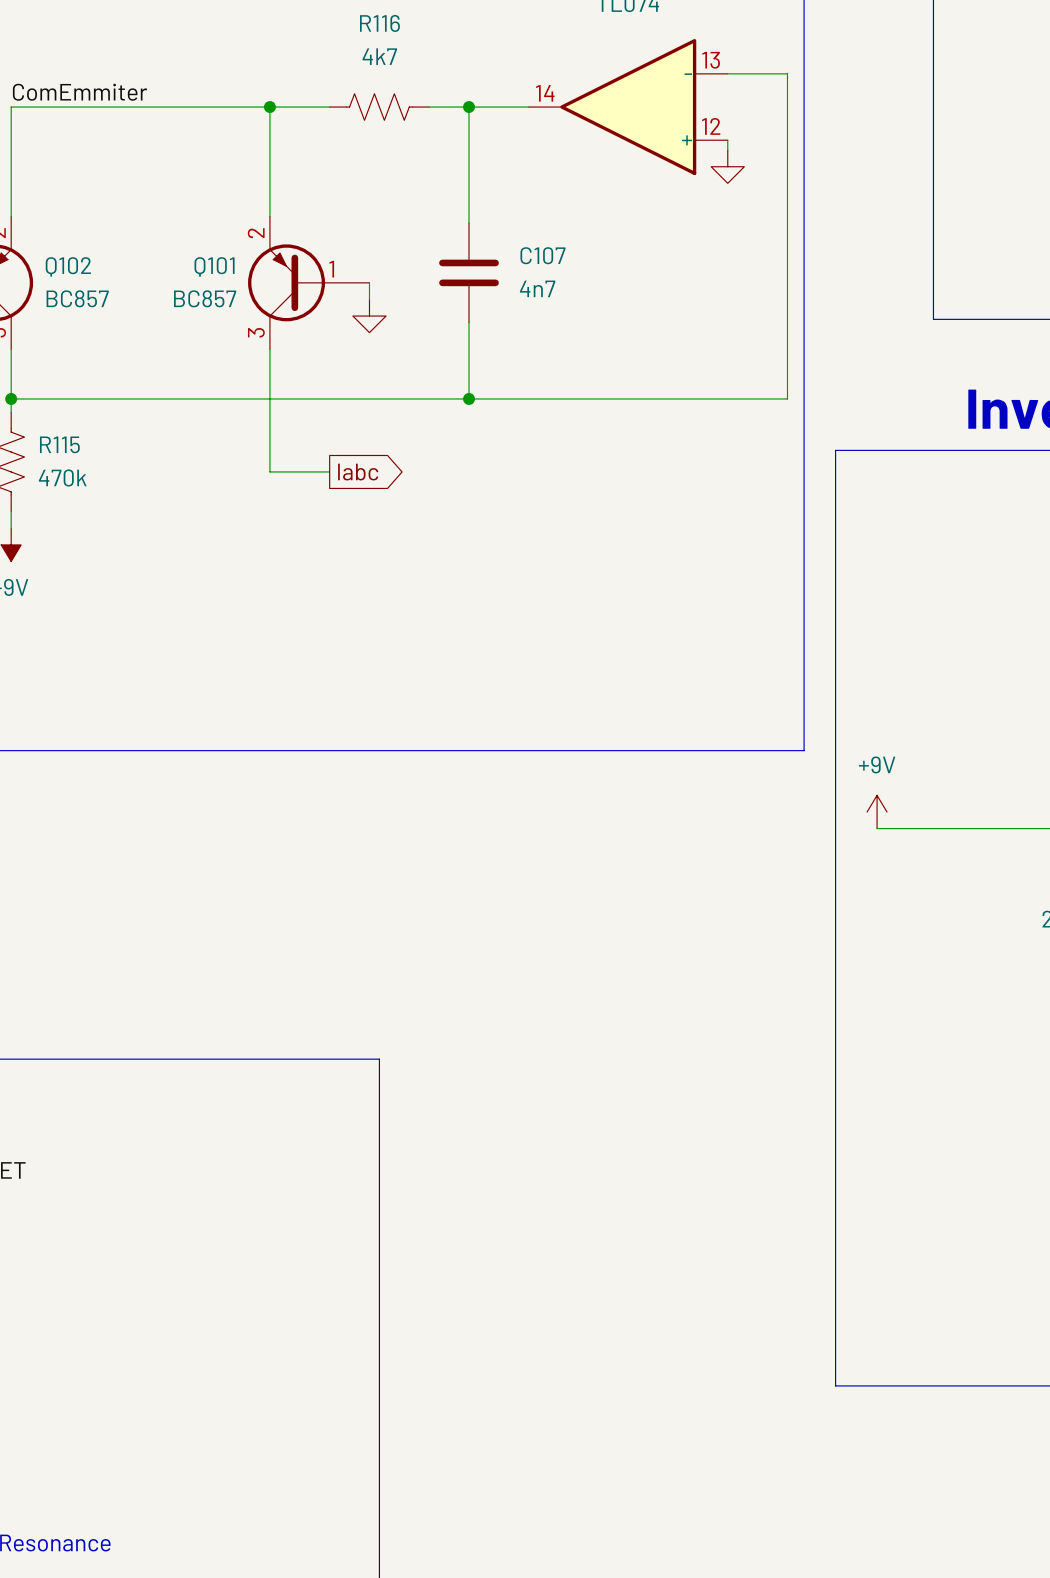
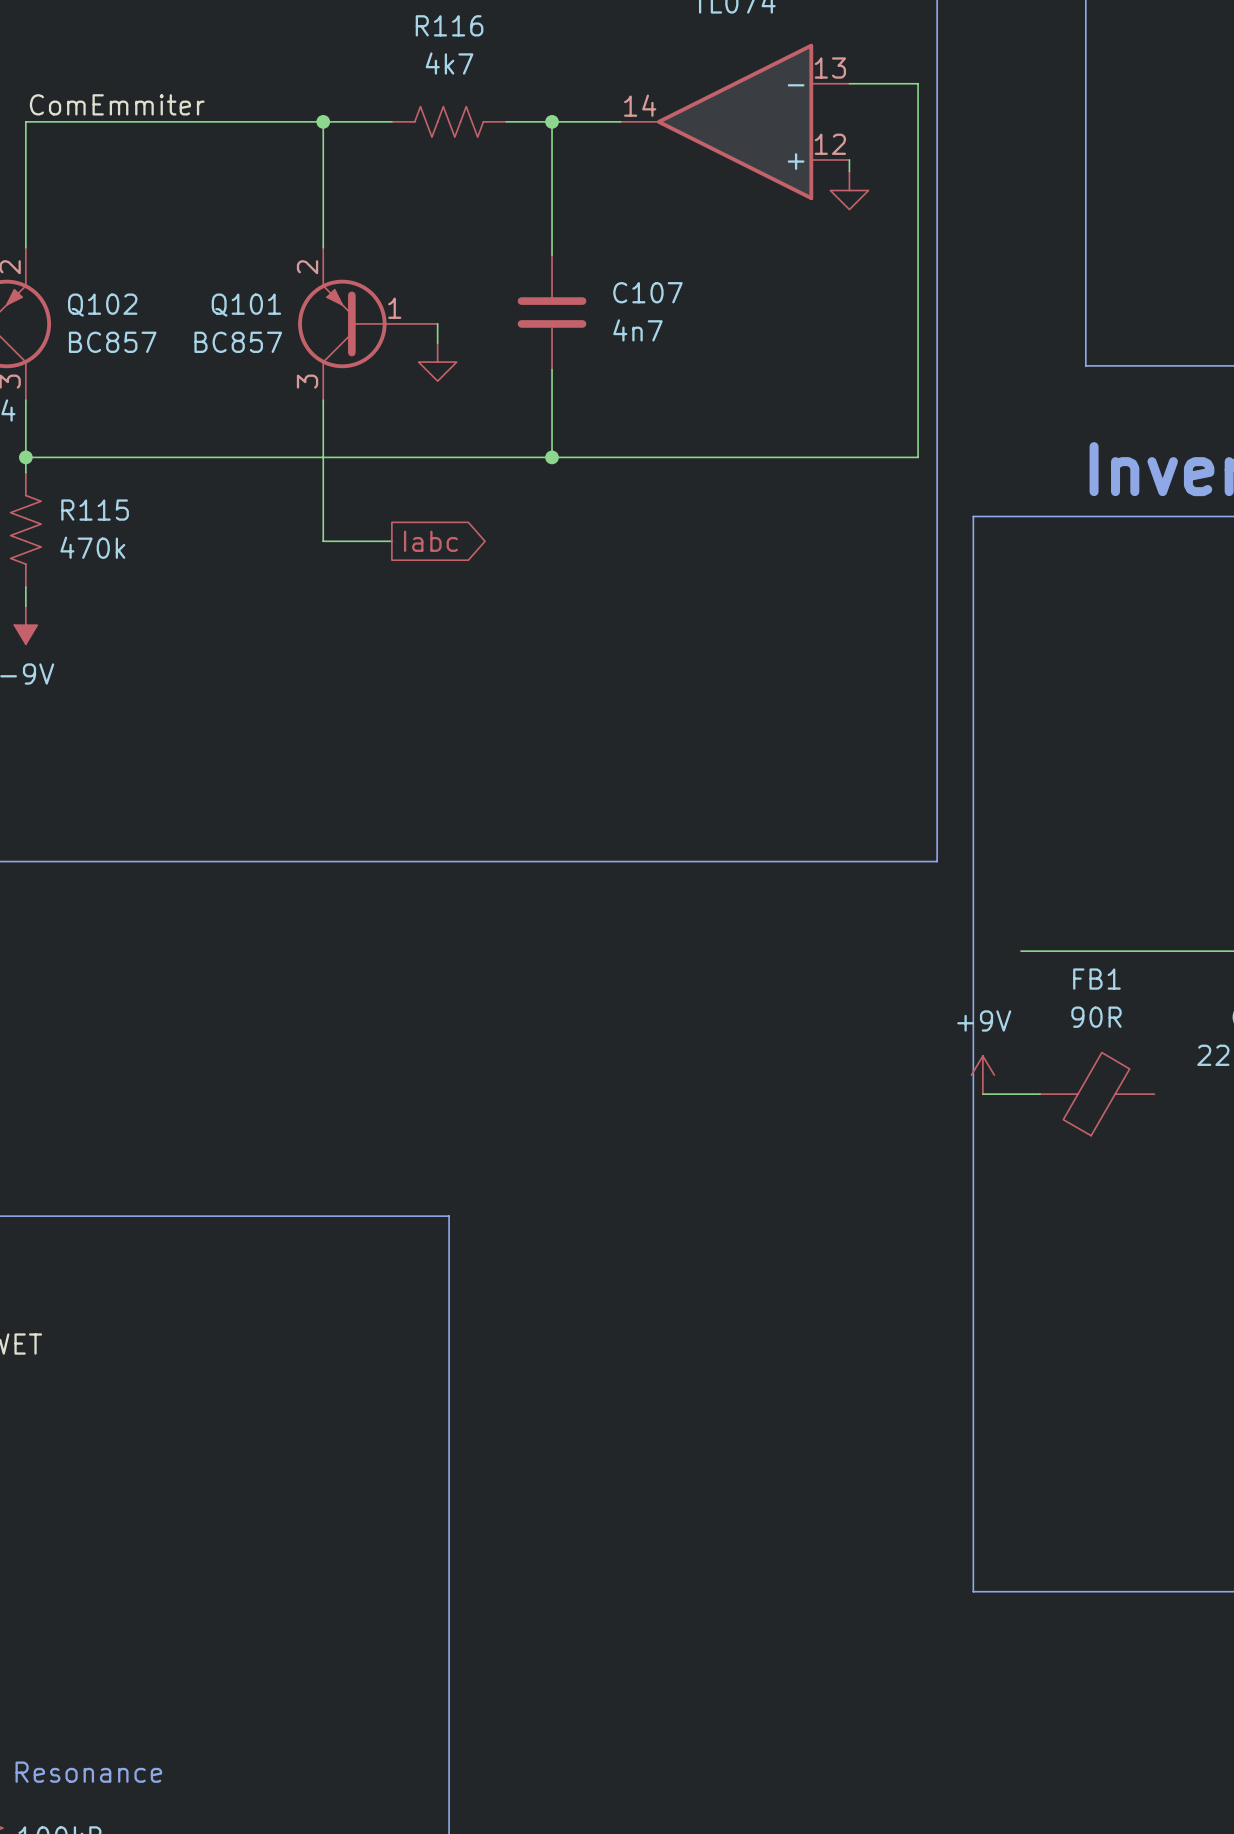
power symbol position: +9V (877, 812) -> +9V (982, 1075)
wire: none -> (982, 1094) (1040, 1094)
FB1: none -> 90R (1097, 1094)

